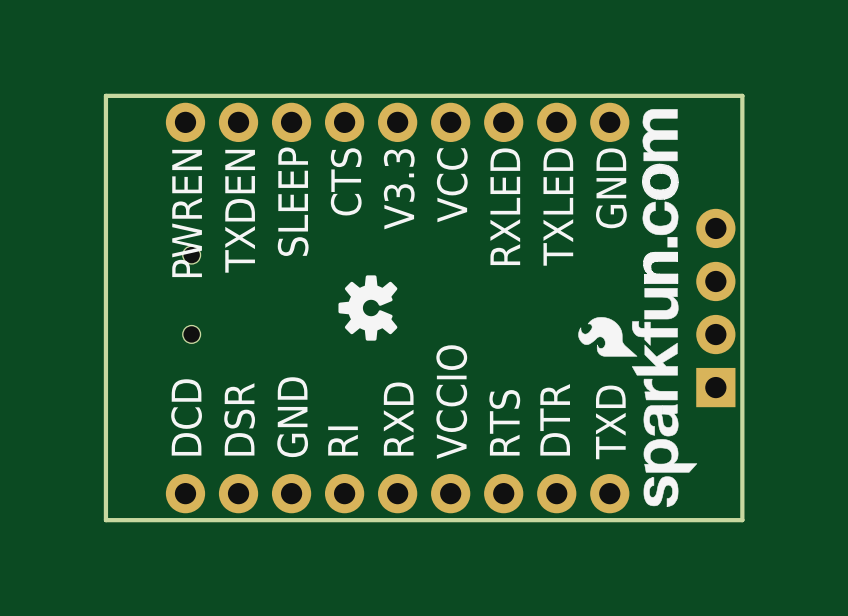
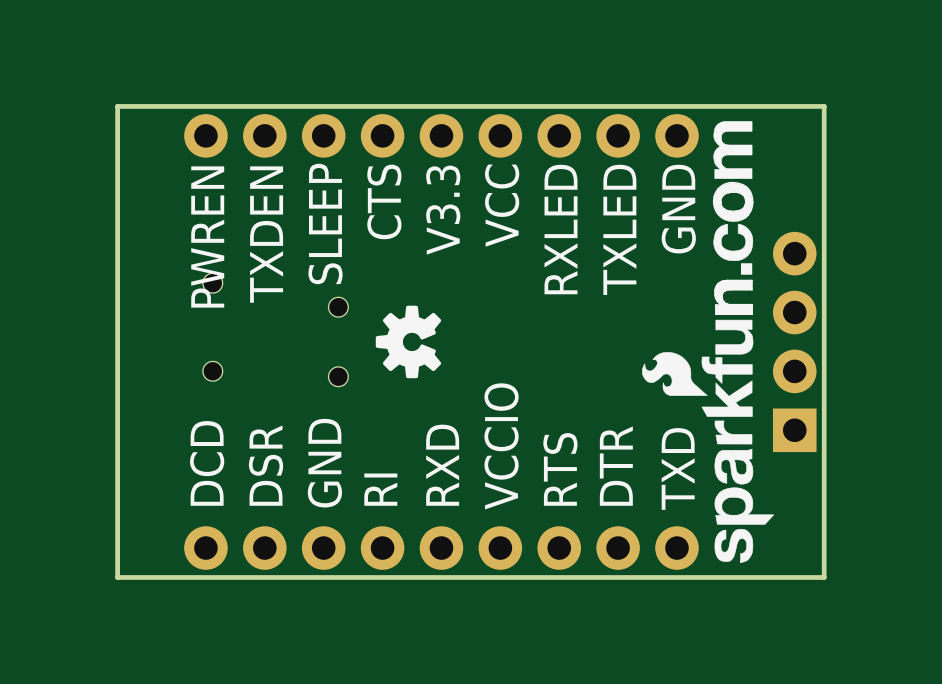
part: none -> (338, 341)

